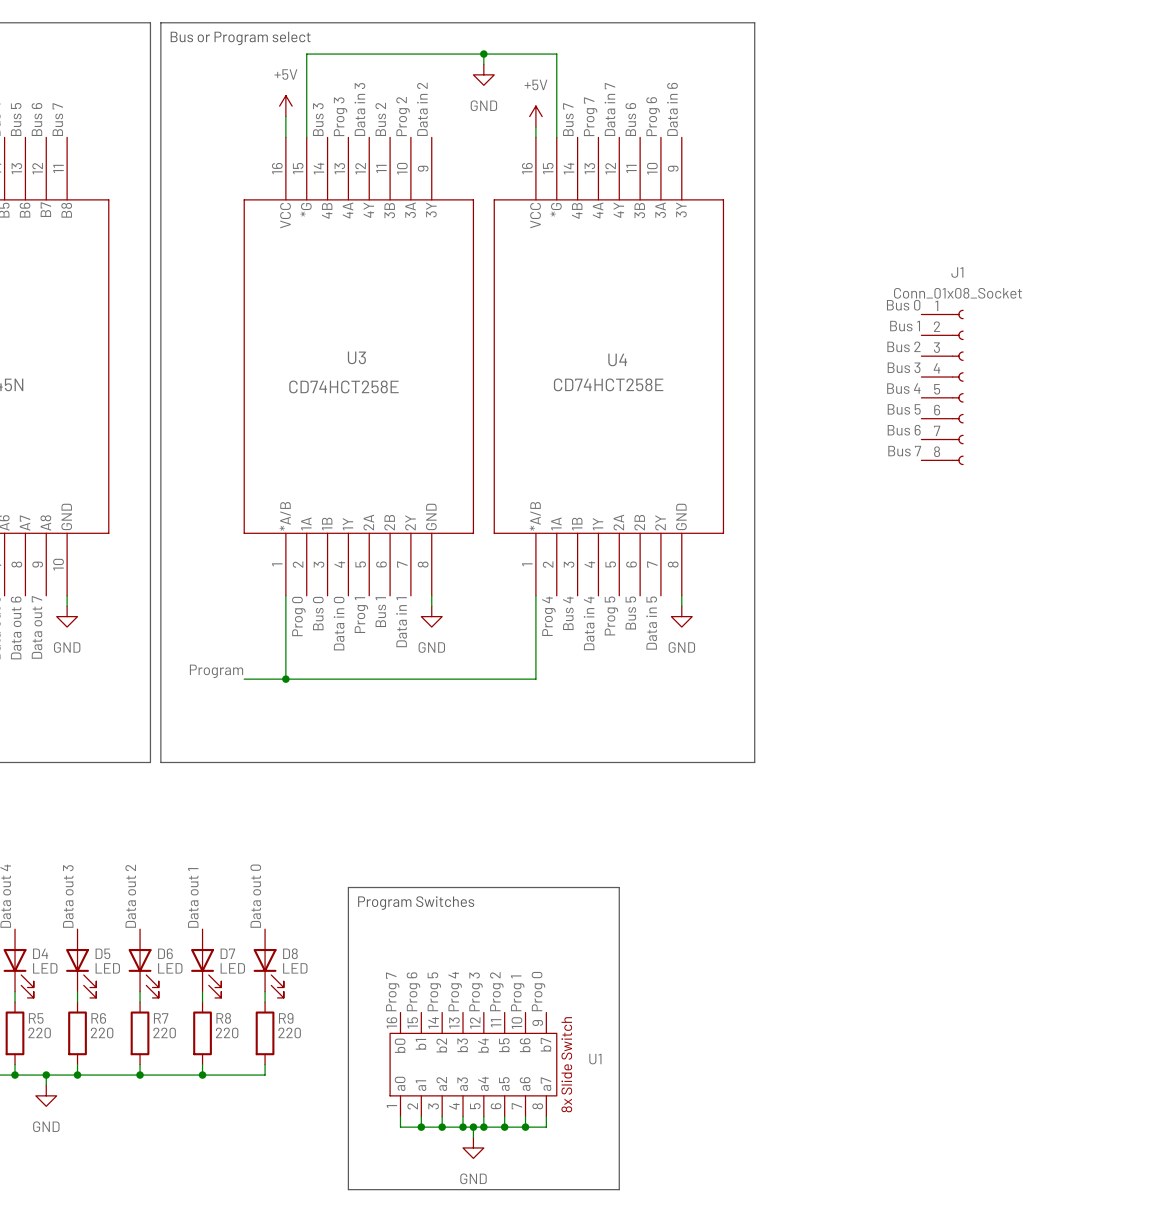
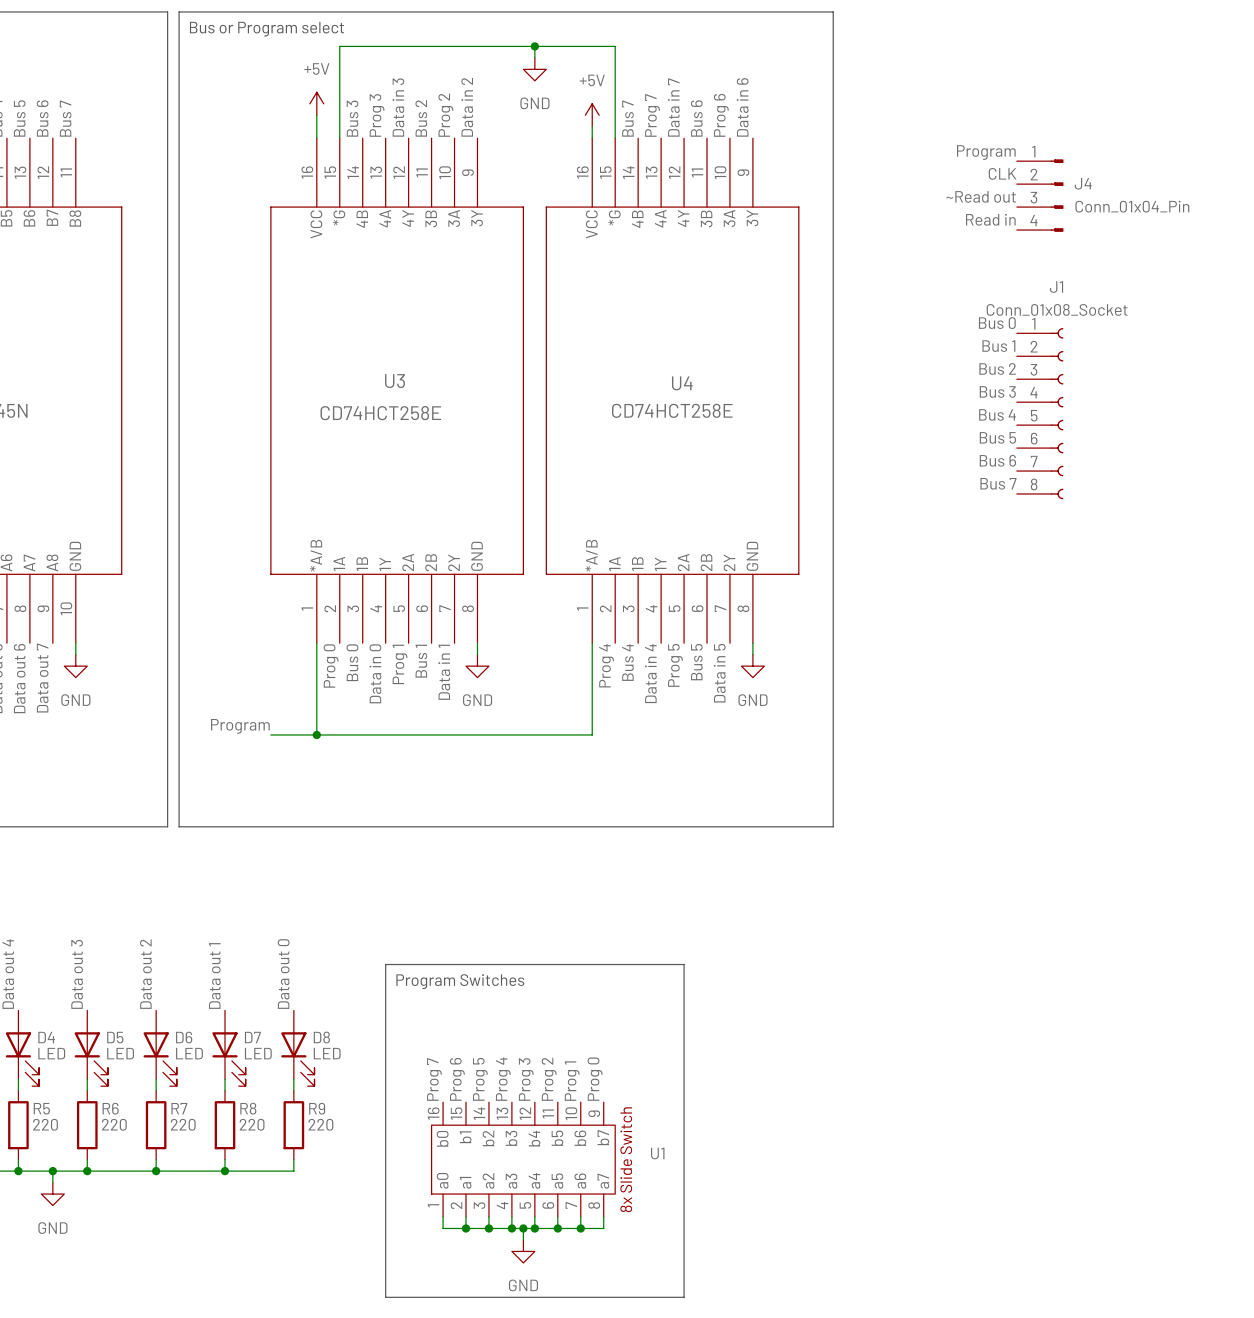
label: none -> Program (986, 152)
label: none -> CLK (1002, 173)
J4: none -> Conn_01x04_Pin (1040, 195)
label: none -> ~Read out (981, 196)
label: none -> Read in (990, 219)

